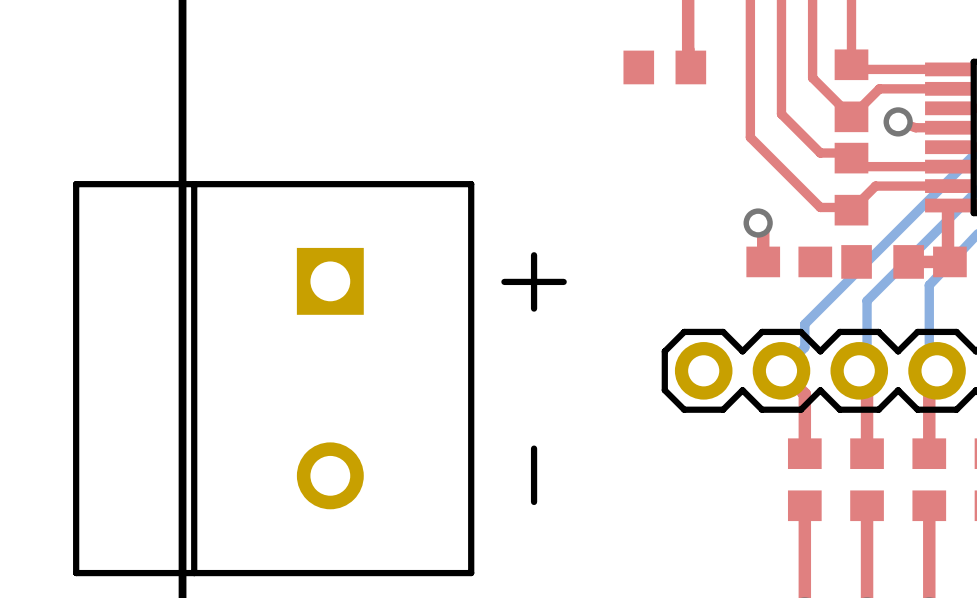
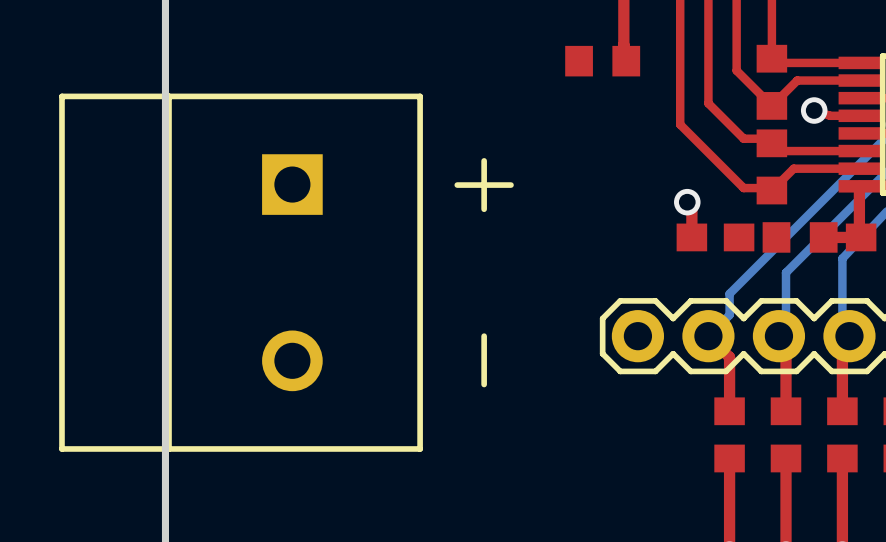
part position: (273, 378) -> (241, 272)
text position: - + (534, 378) -> - + (484, 272)

